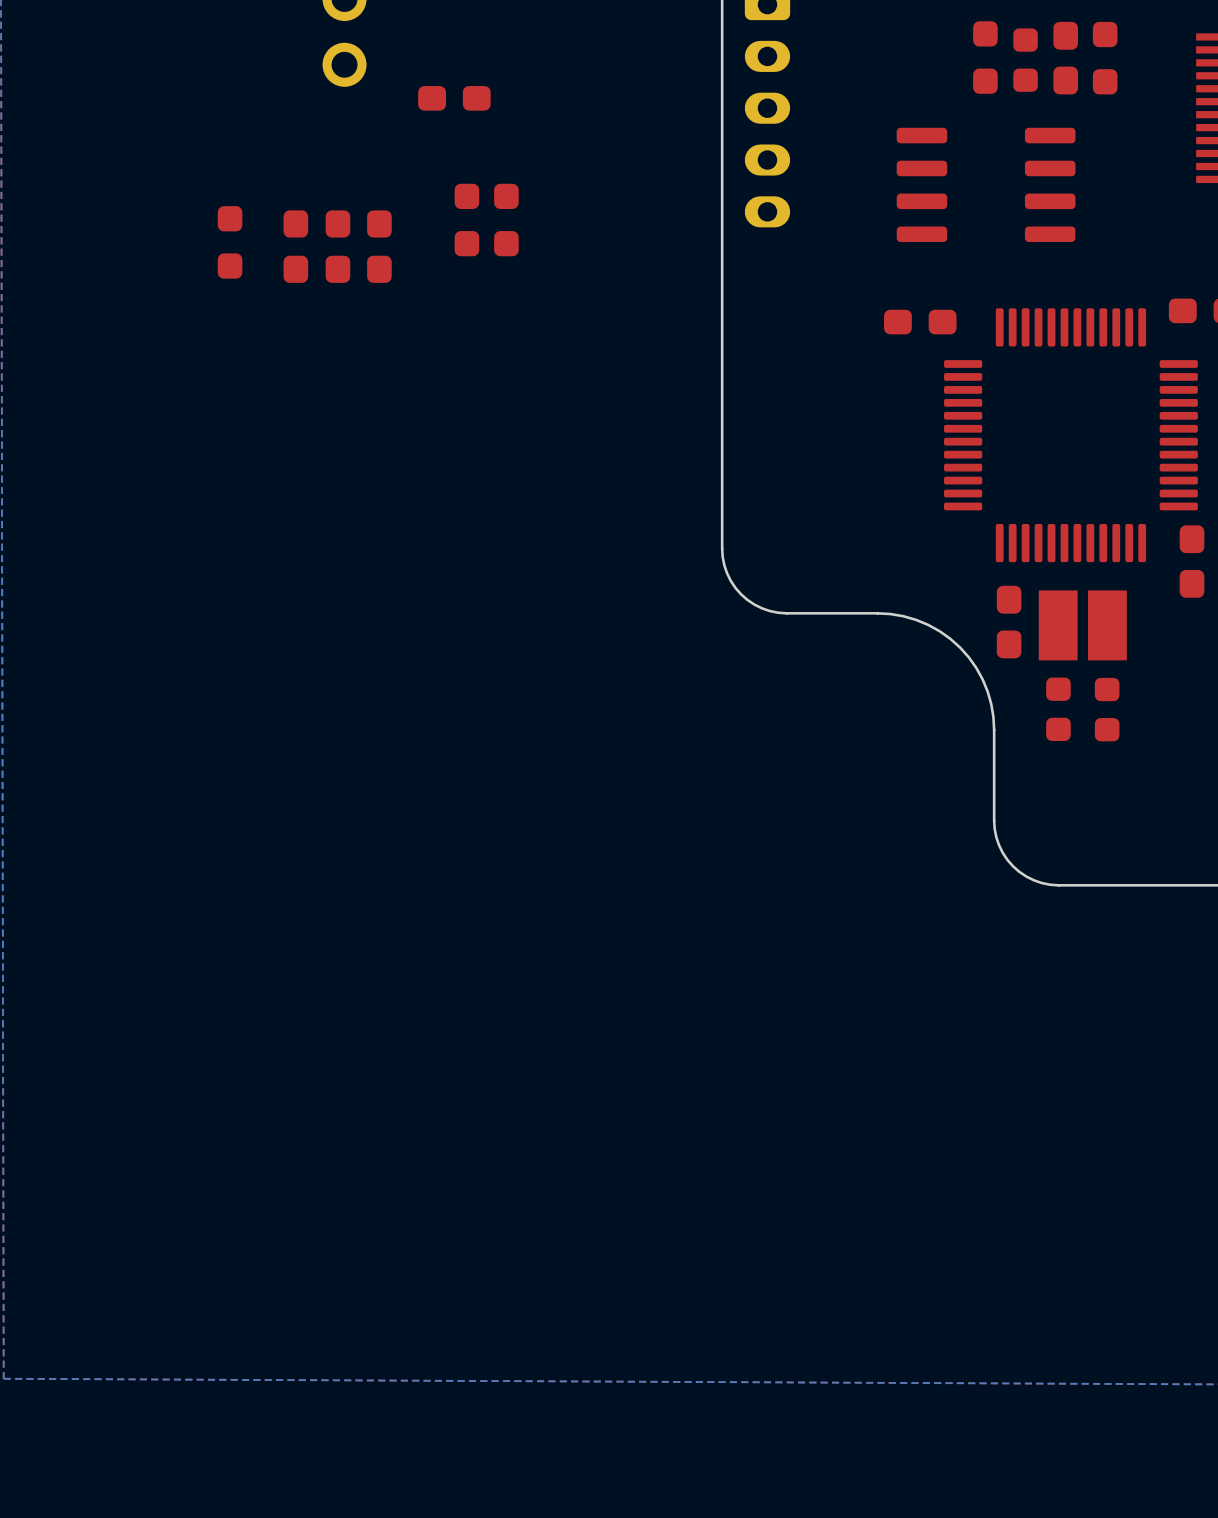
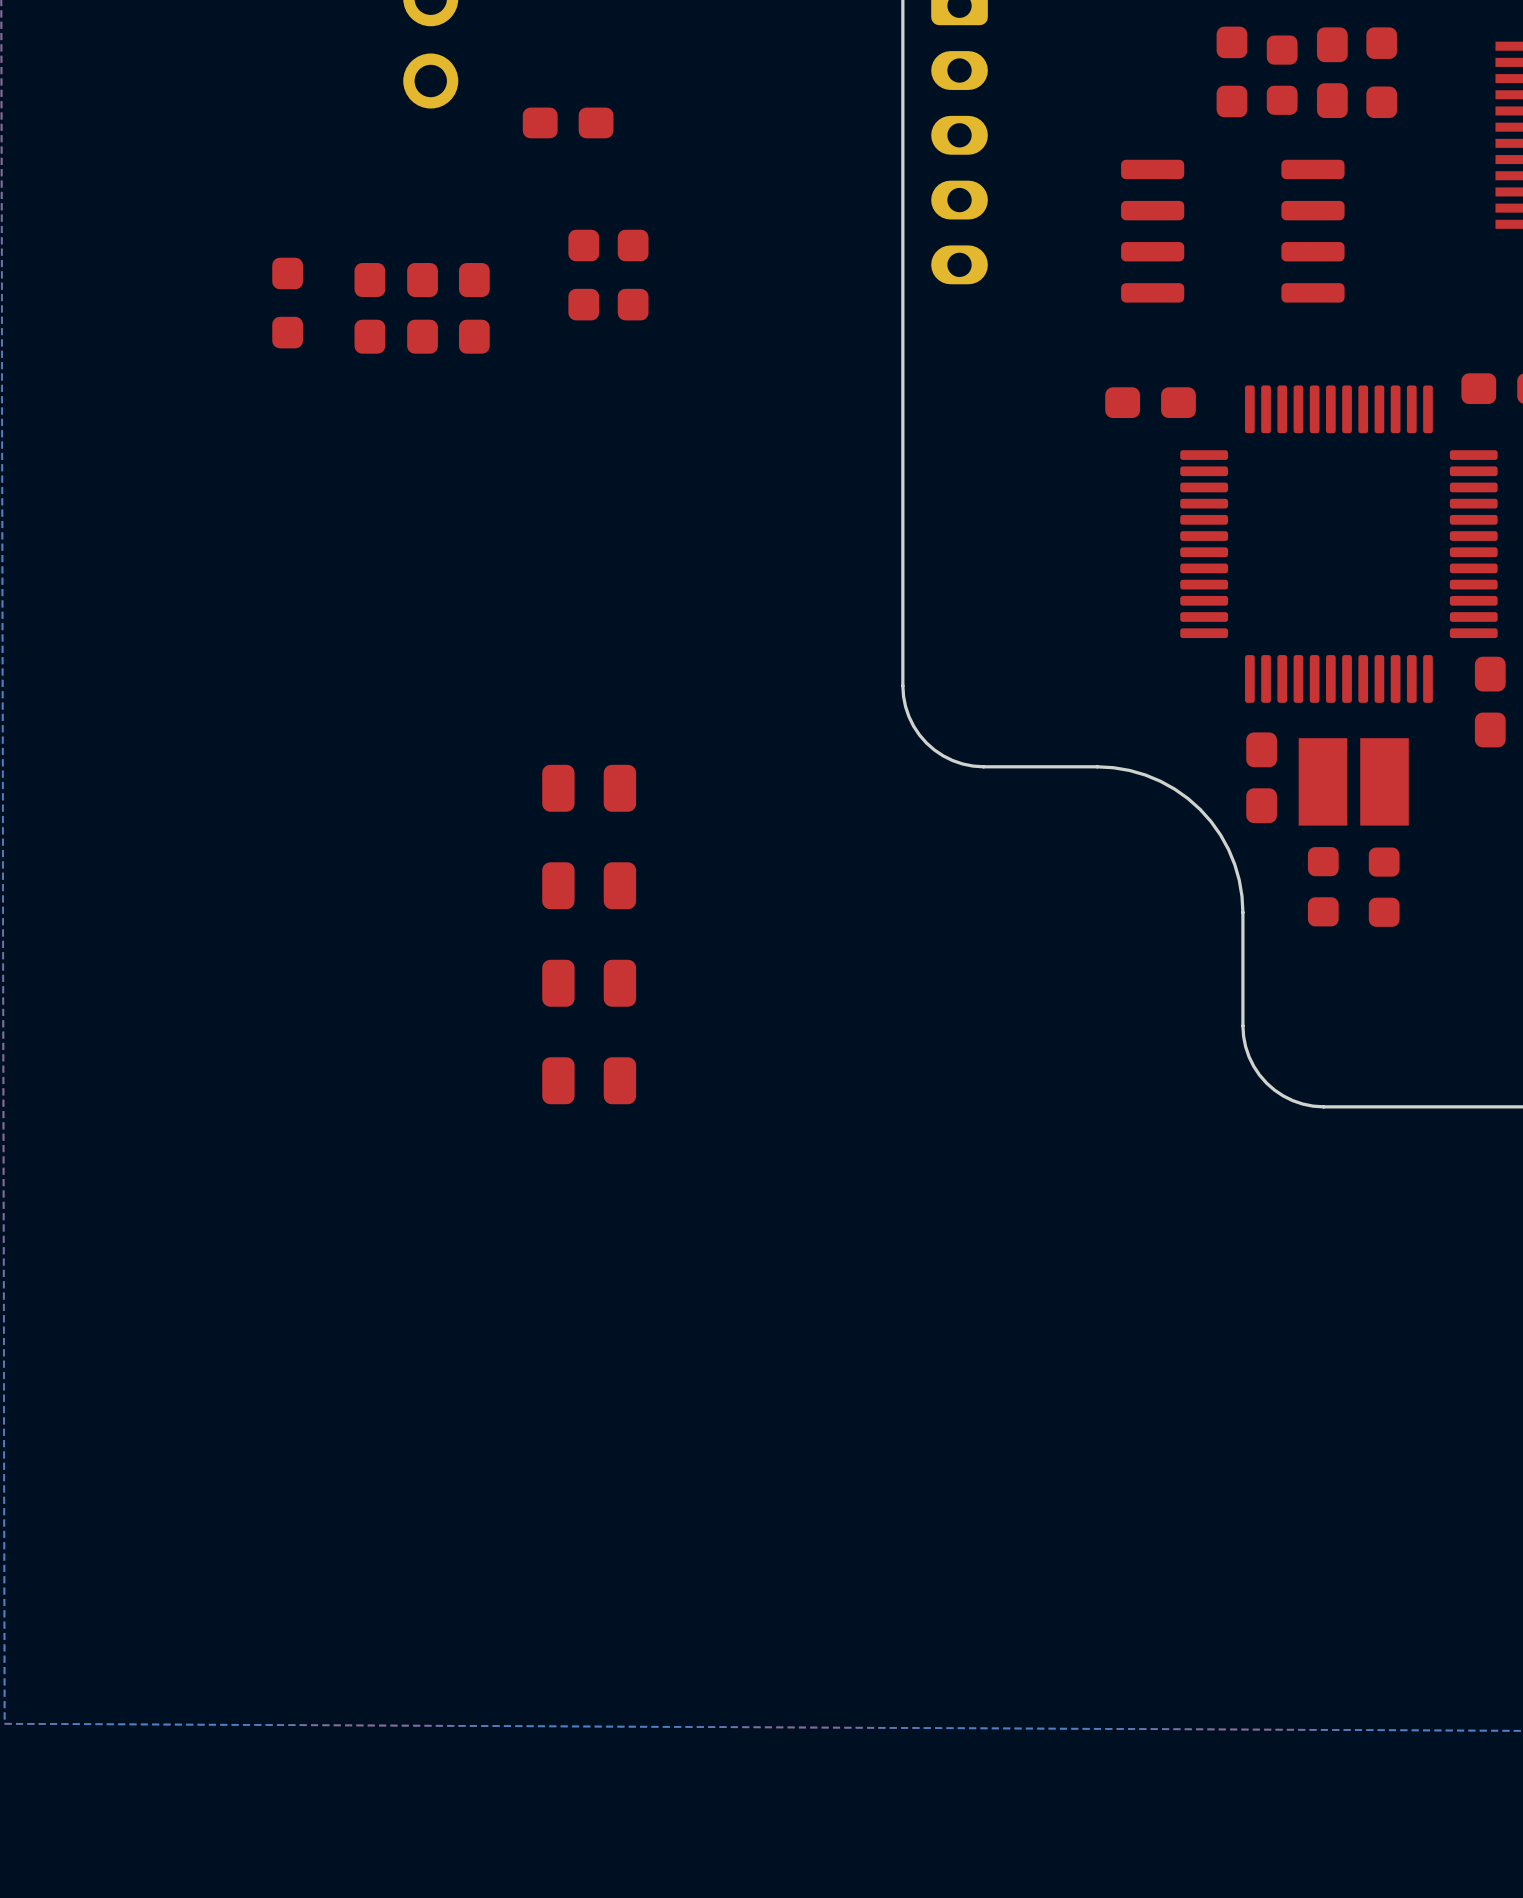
part: none -> (589, 788)
part: none -> (589, 885)
part: none -> (589, 983)
part: none -> (589, 1080)

